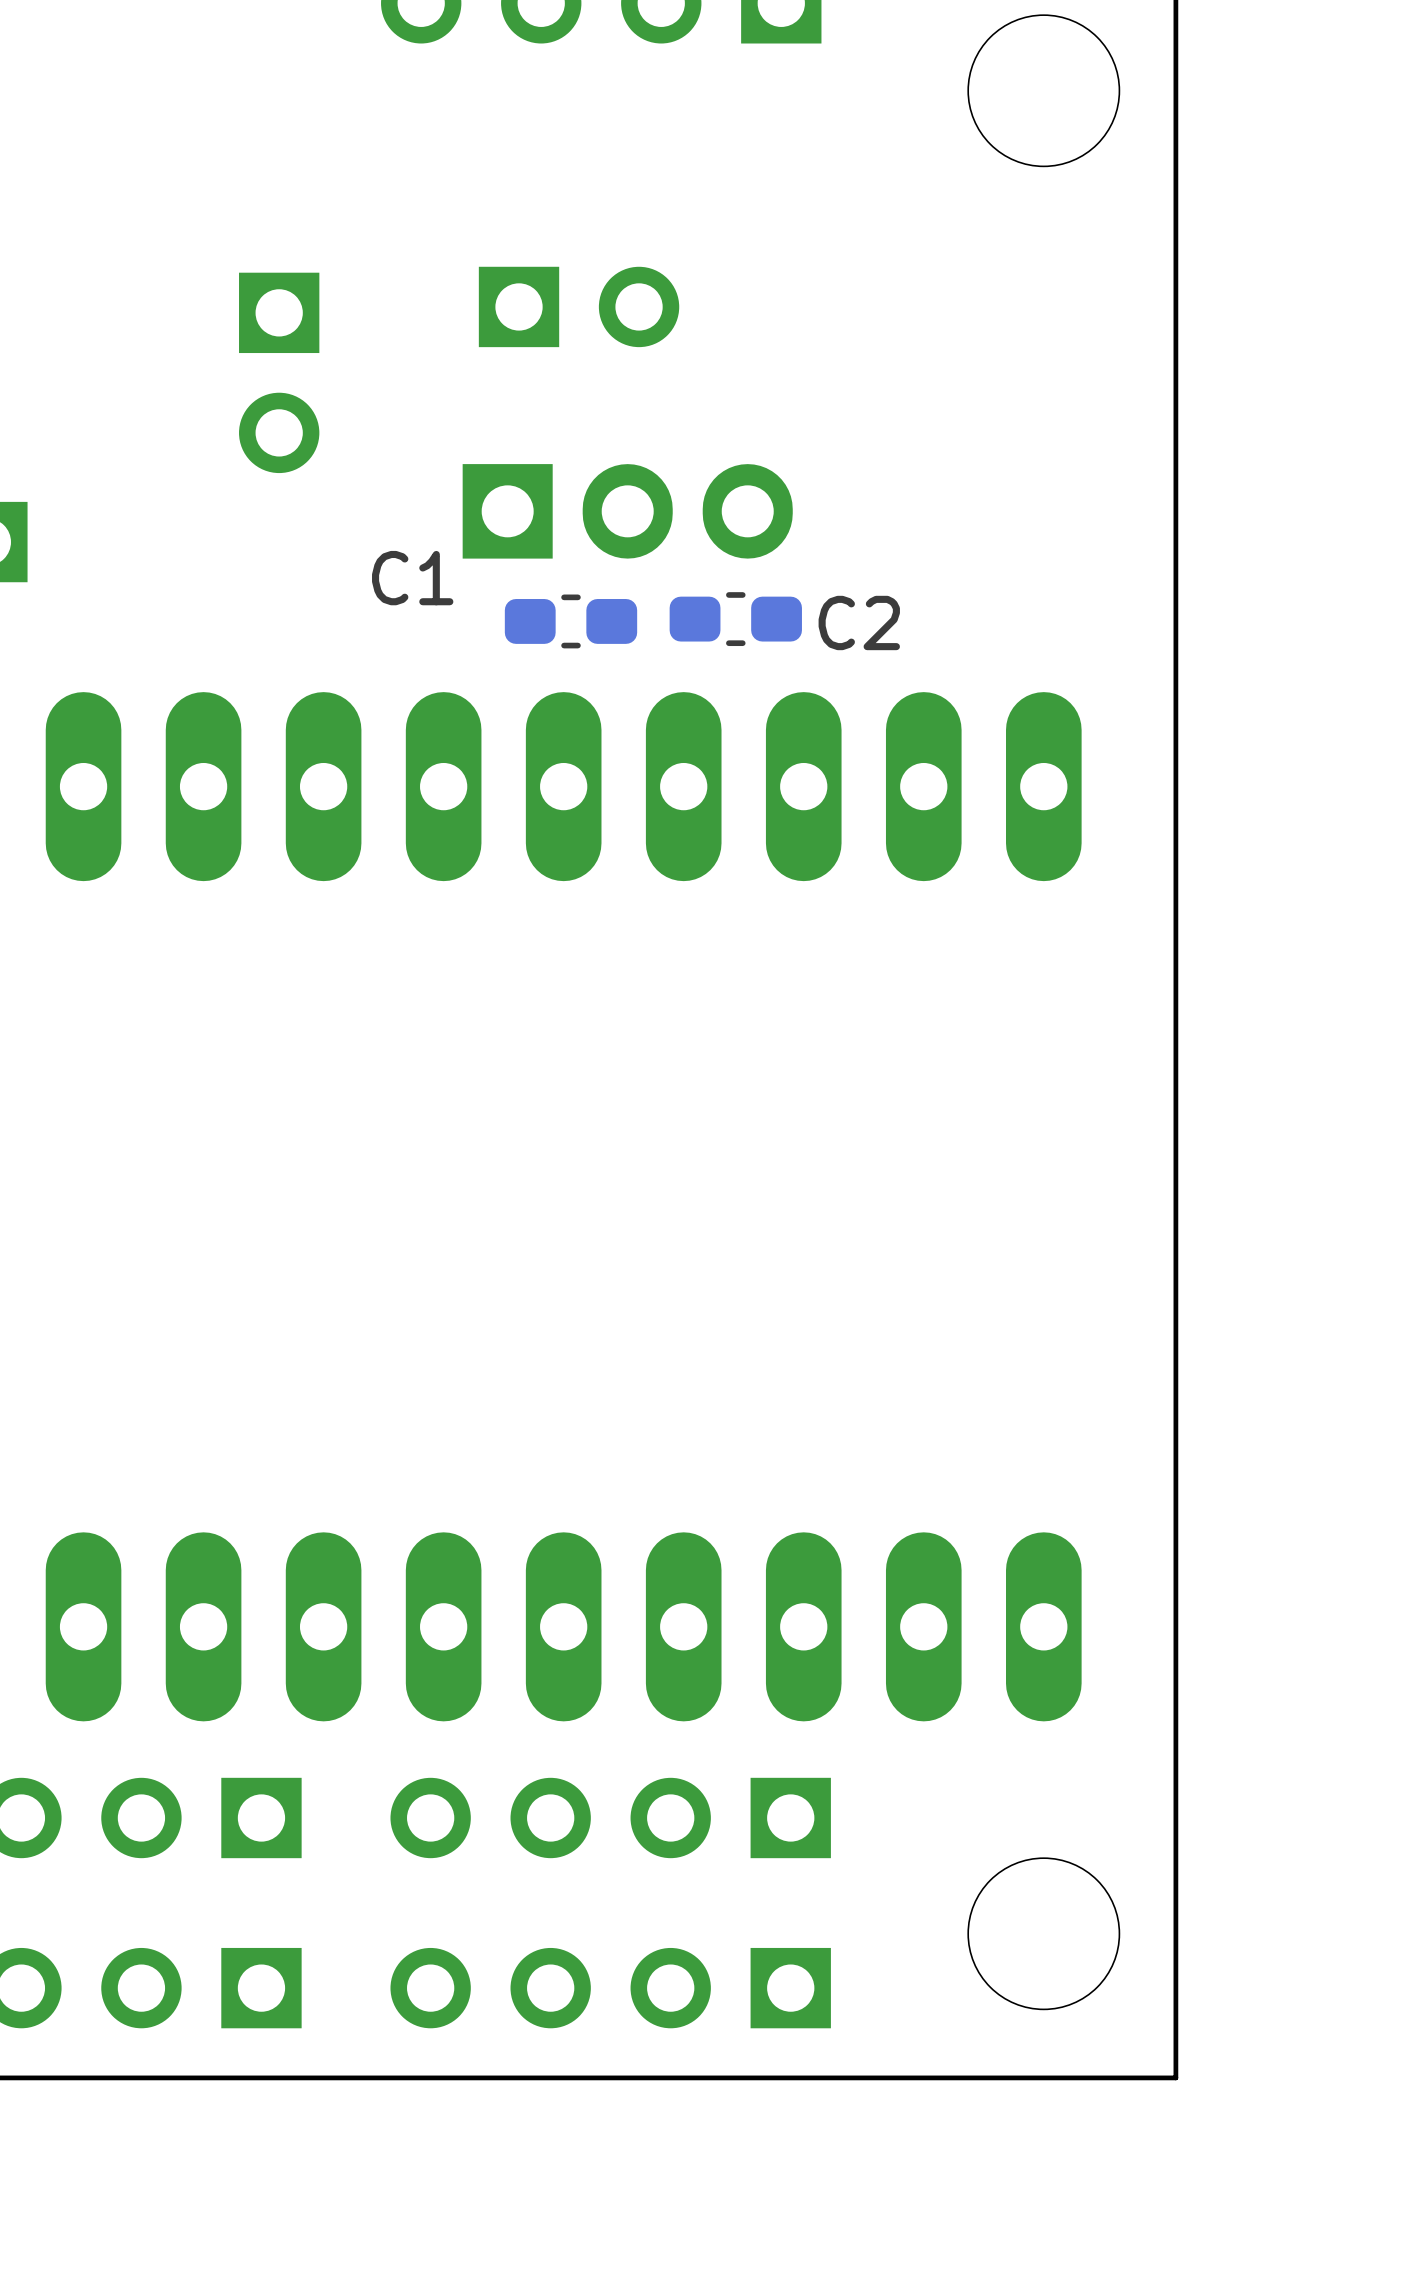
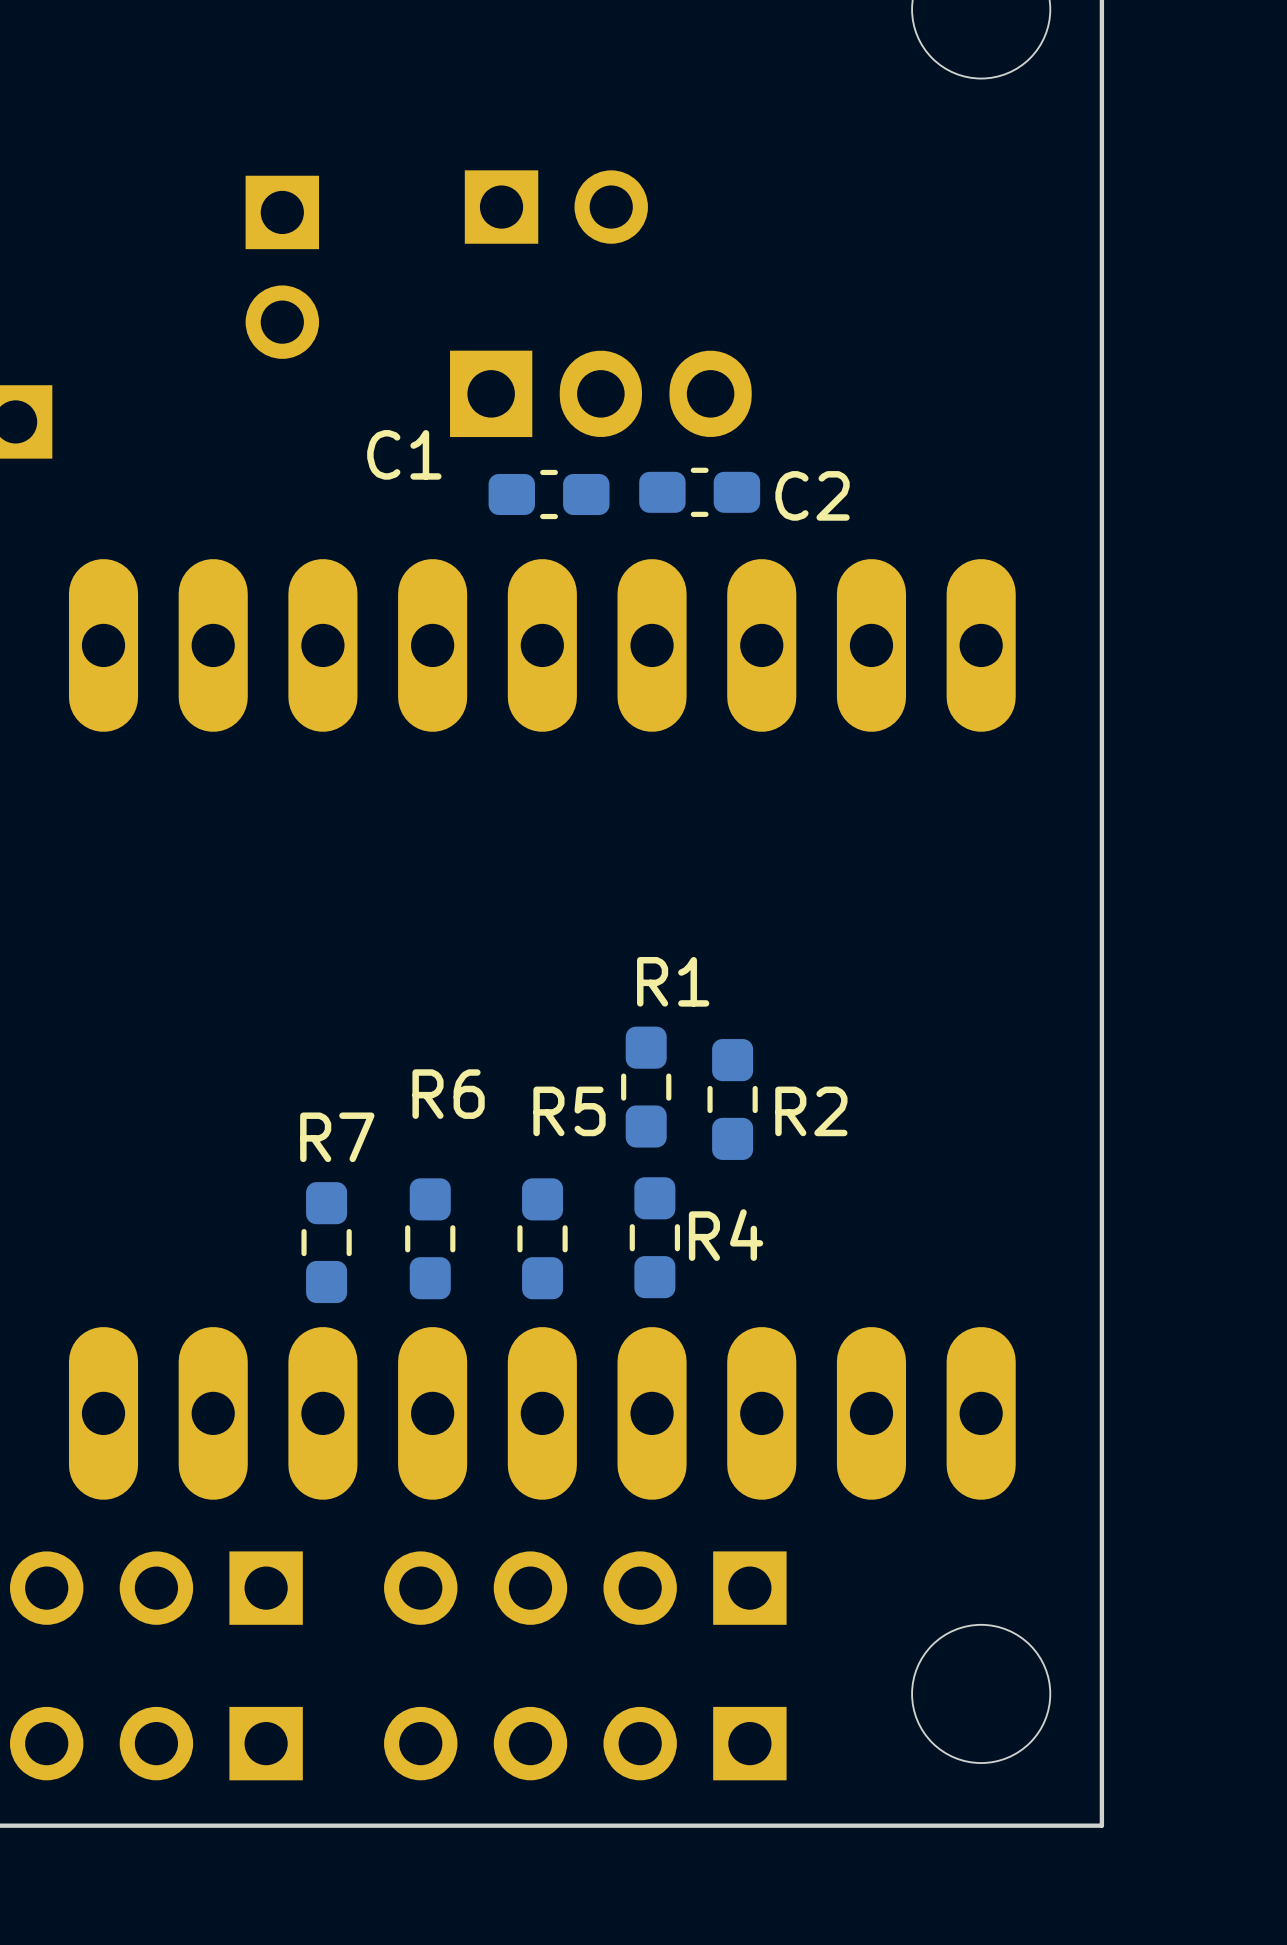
R1: none -> (646, 1087)
R2: none -> (732, 1099)
R4: none -> (654, 1237)
R6: none -> (430, 1238)
R5: none -> (542, 1238)
R7: none -> (326, 1242)

